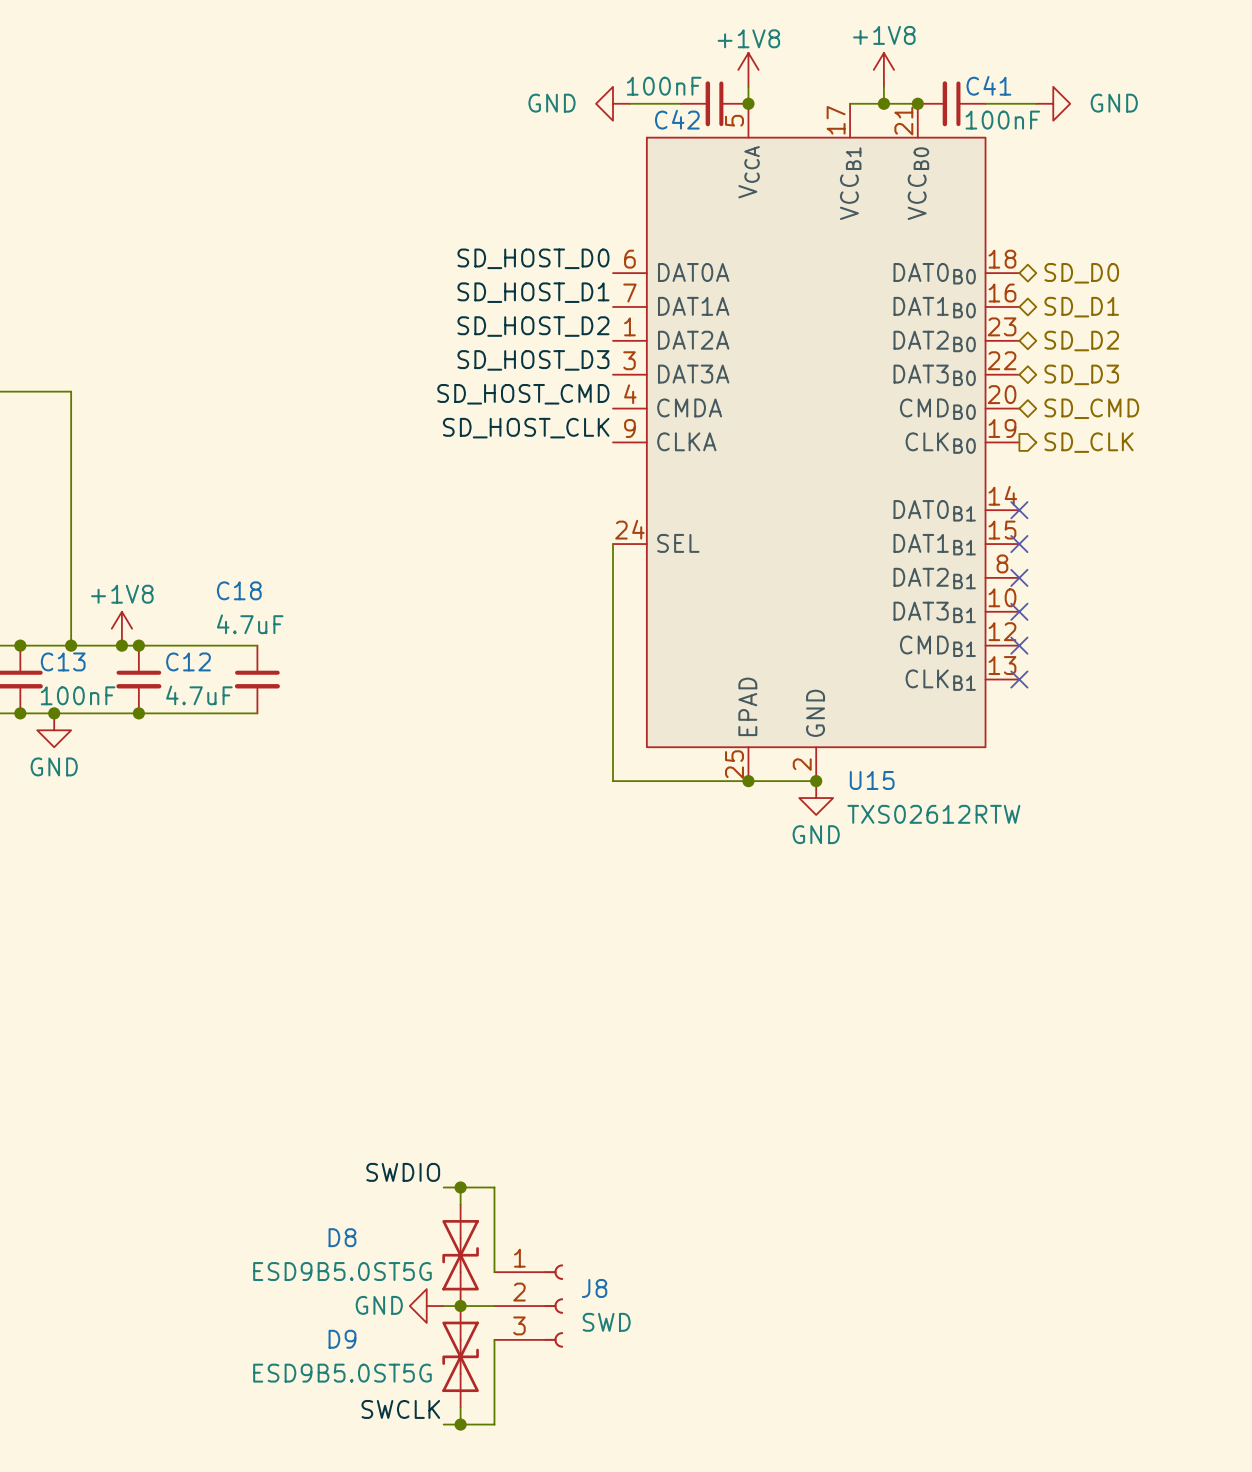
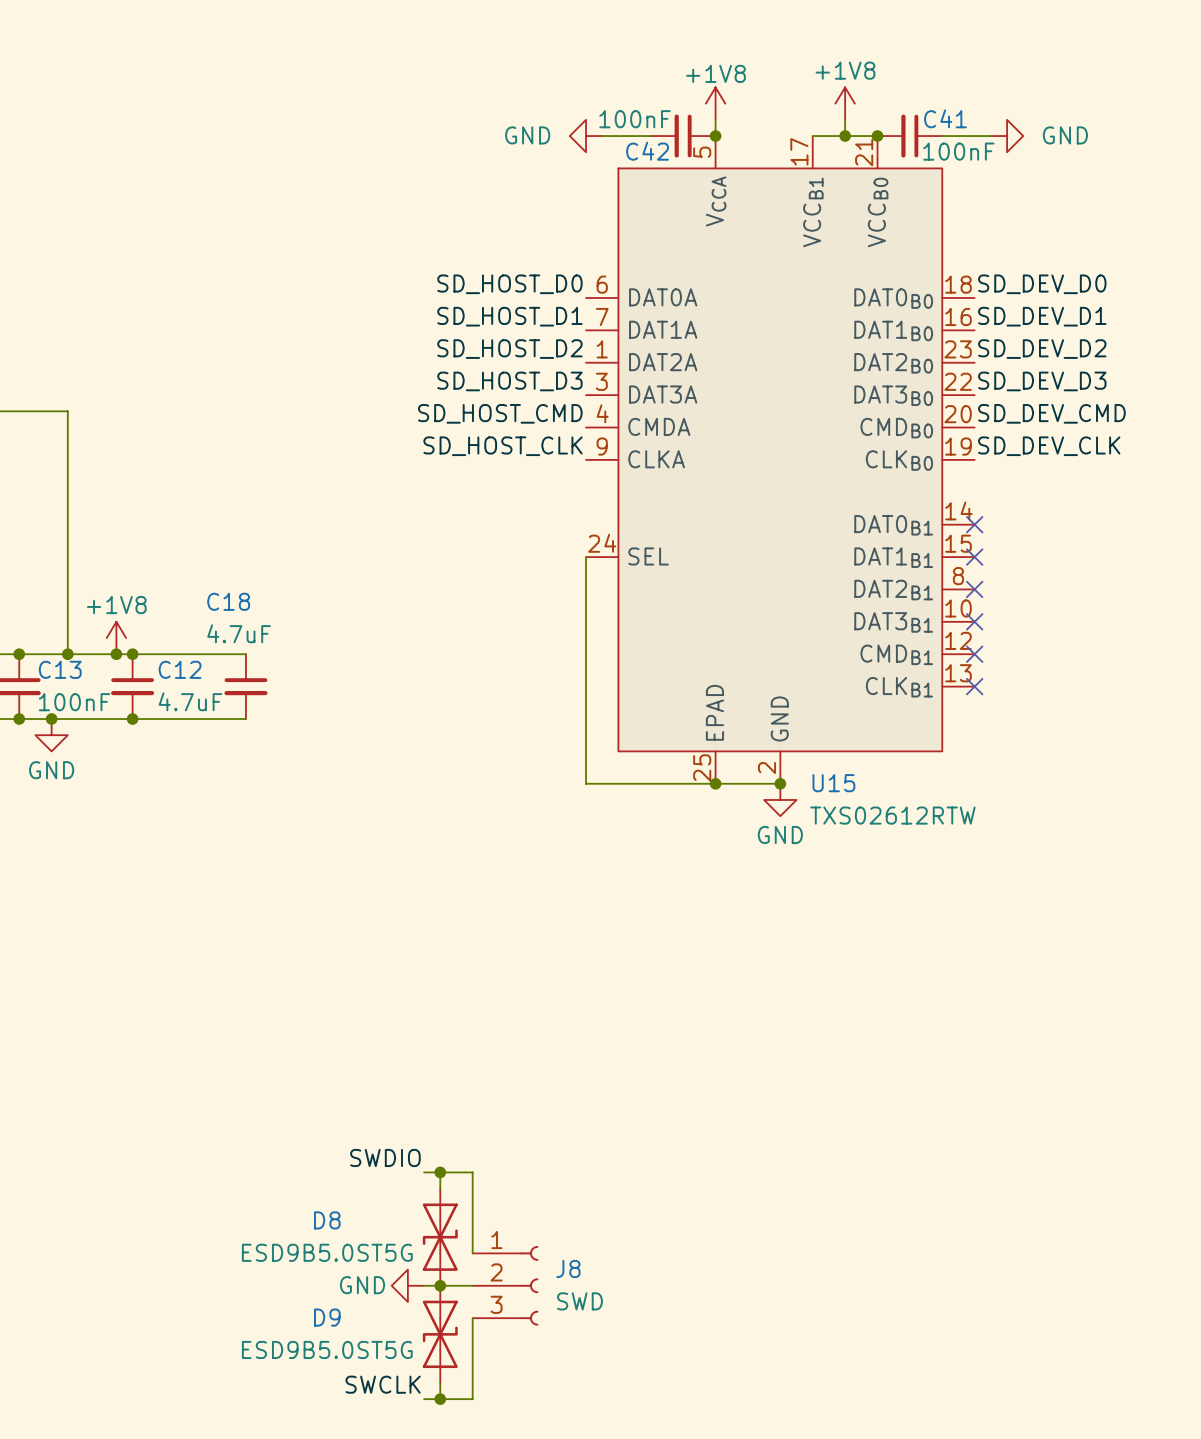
label: none -> SD_DEV_D0 (1042, 284)
hierarchical label: SD_D0 (1081, 273) -> none
label: none -> SD_DEV_D1 (1042, 316)
hierarchical label: SD_D1 (1081, 307) -> none
label: none -> SD_DEV_D2 (1042, 349)
hierarchical label: SD_D2 (1081, 341) -> none
label: none -> SD_DEV_D3 (1042, 381)
hierarchical label: SD_D3 (1081, 374) -> none
label: none -> SD_DEV_CMD (1051, 413)
hierarchical label: SD_CMD (1091, 408) -> none
label: none -> SD_DEV_CLK (1049, 446)
hierarchical label: SD_CLK (1089, 442) -> none

